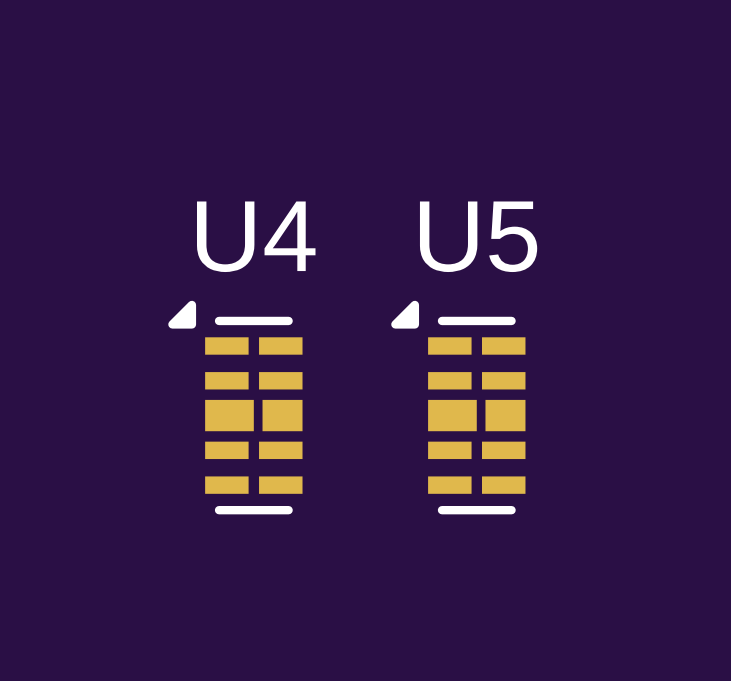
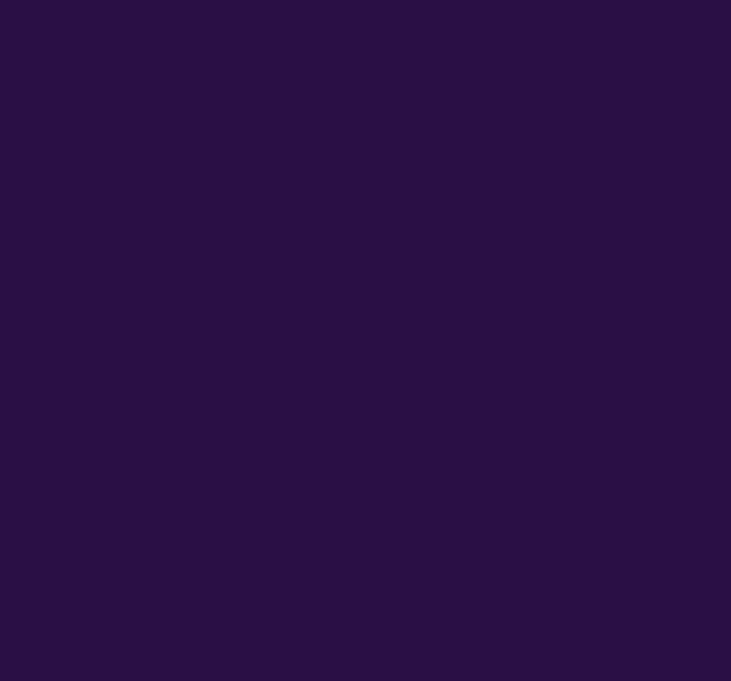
U4: (235, 407) -> none
U5: (458, 407) -> none

